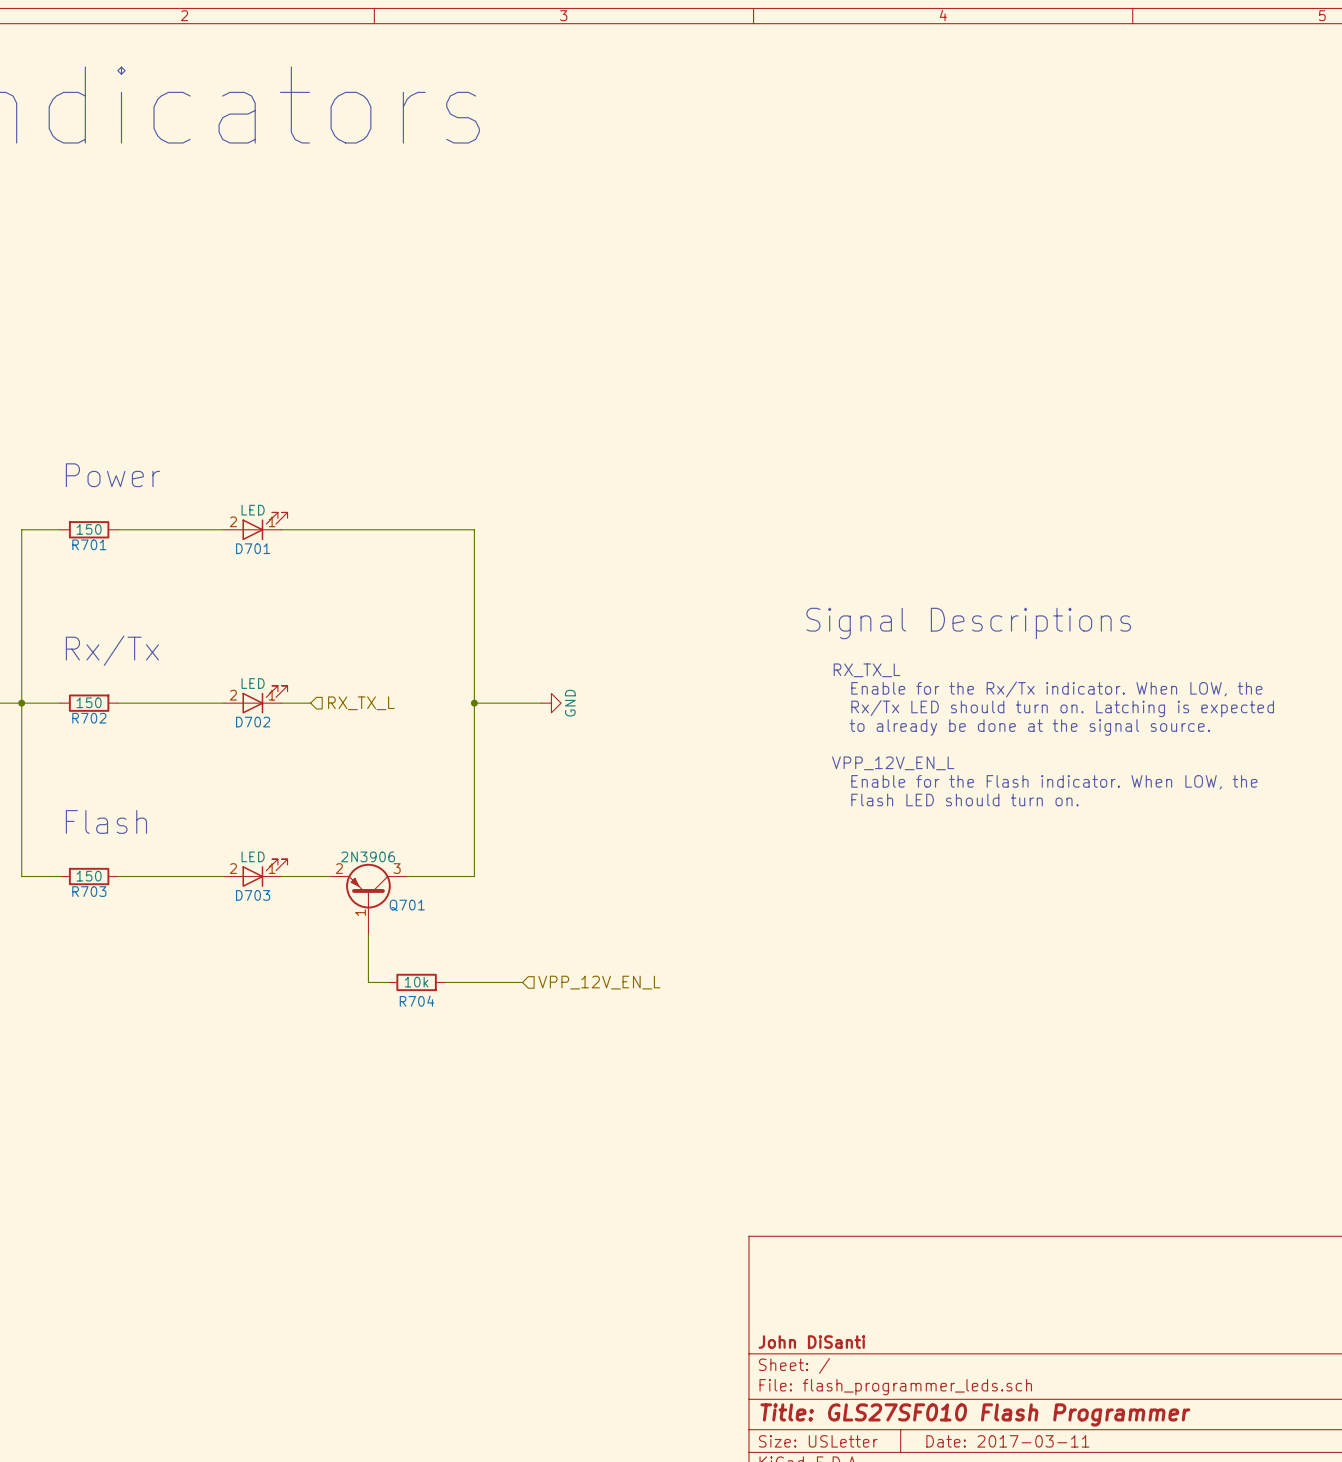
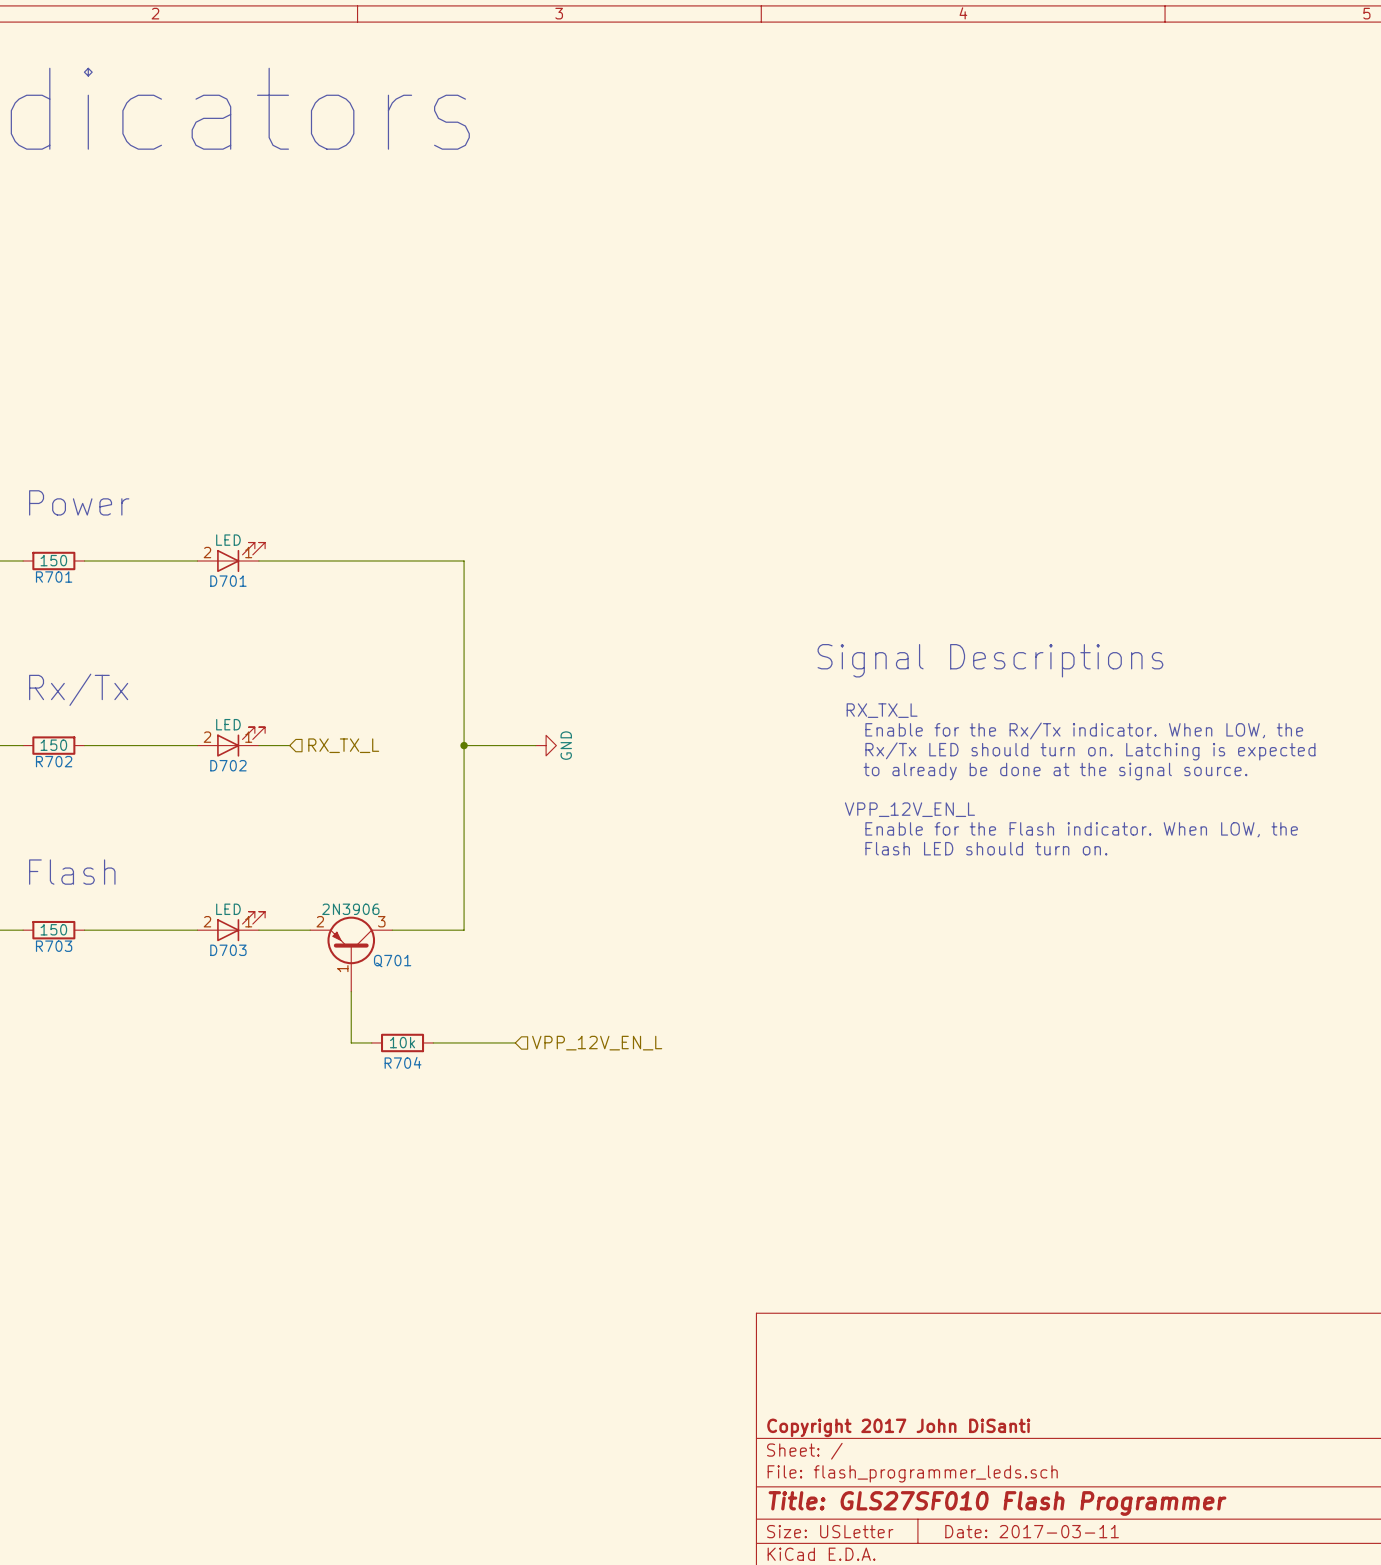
title block: John DiSanti (811, 1342) -> Copyright 2017 John DiSanti (898, 1427)

